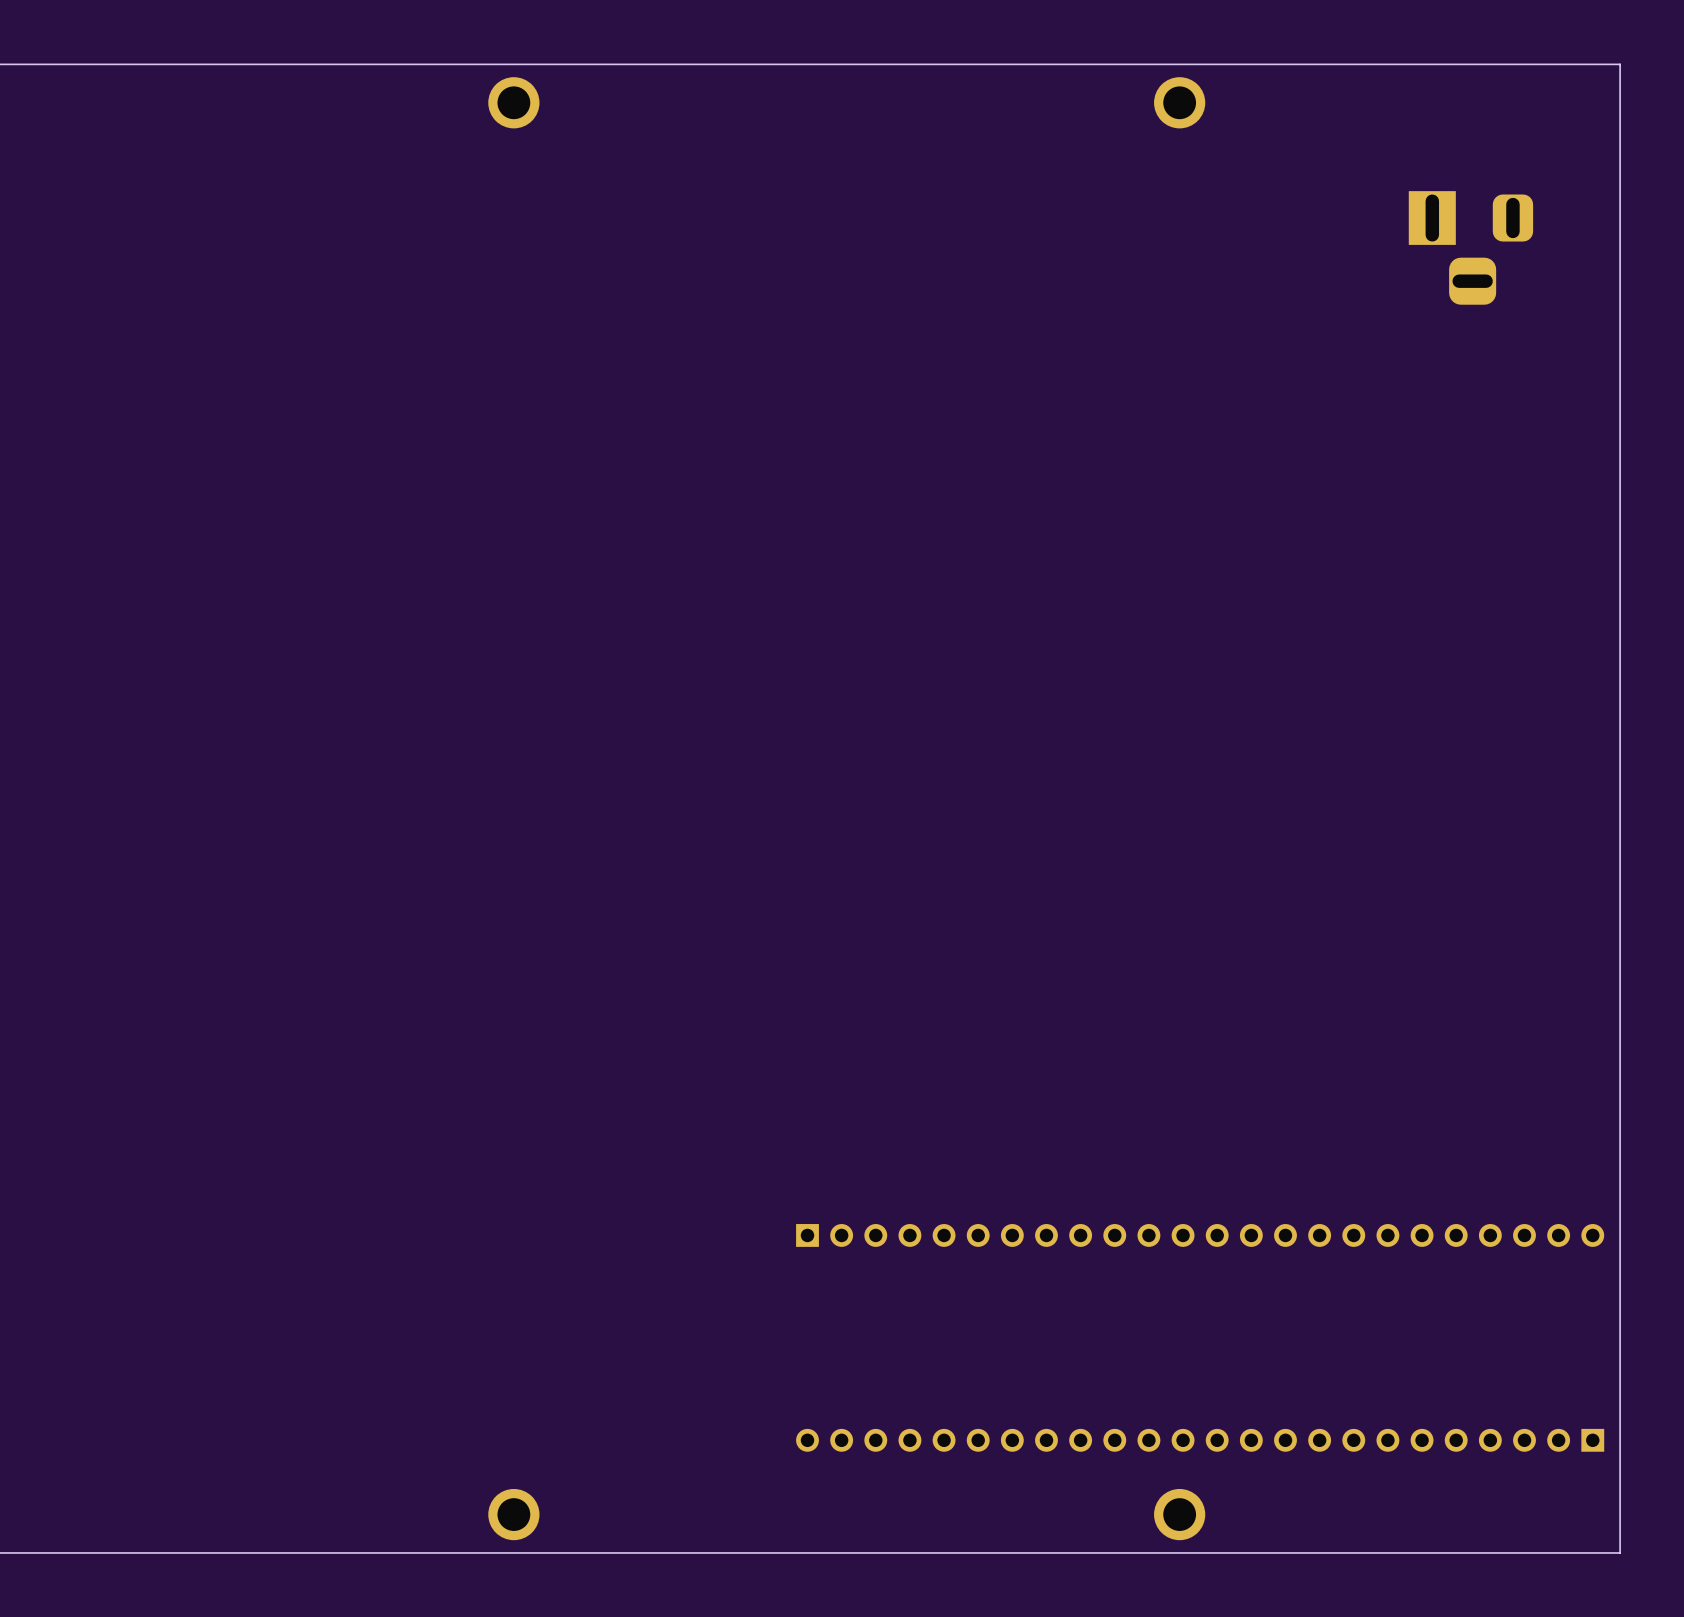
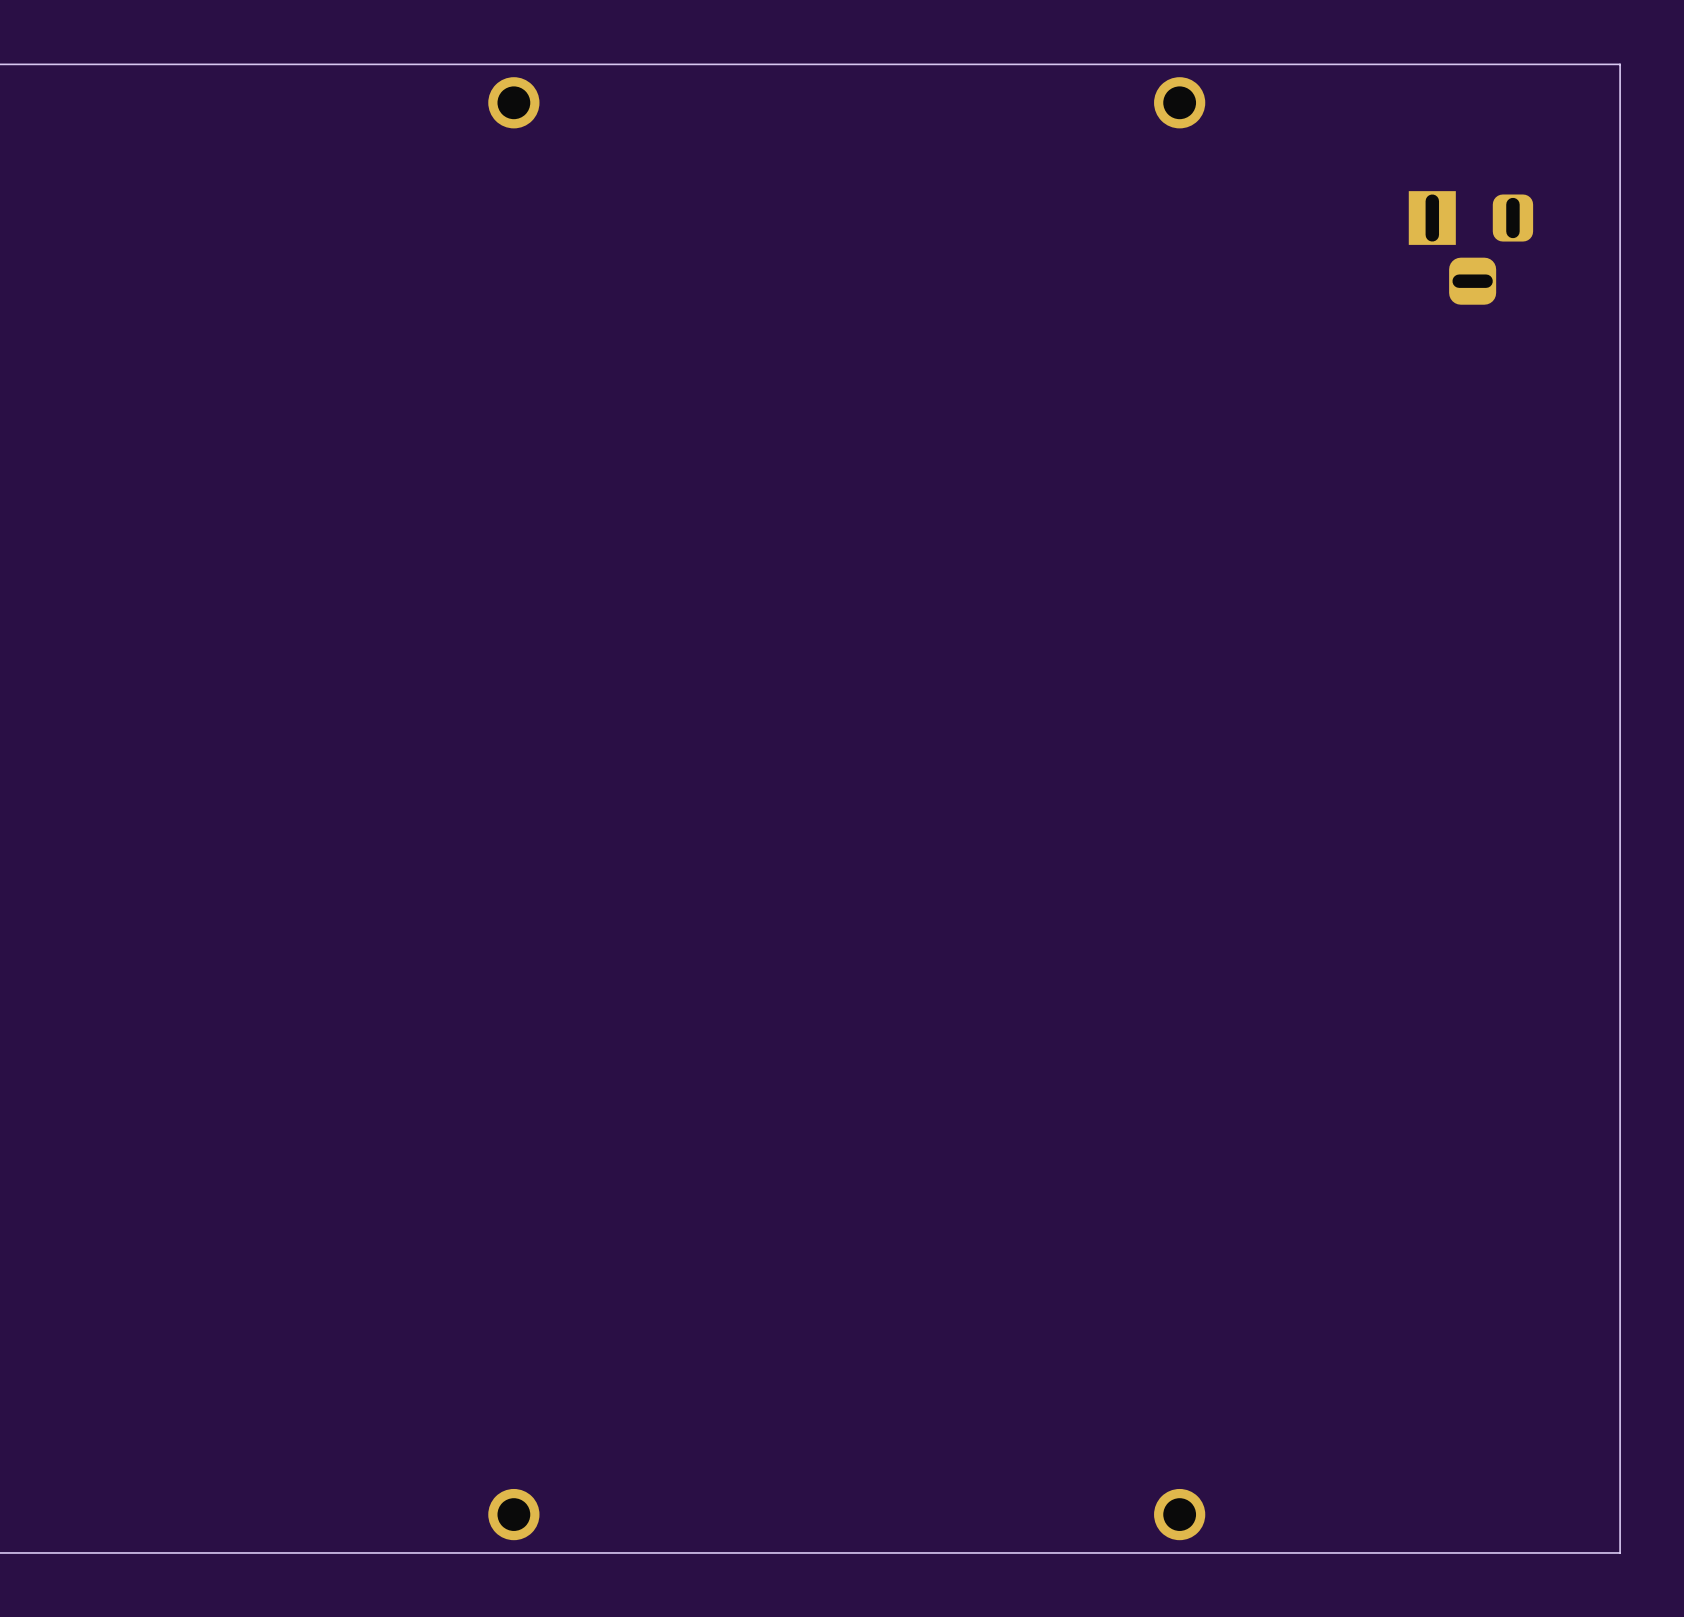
part: (1200, 1235) -> none
part: (1200, 1440) -> none

